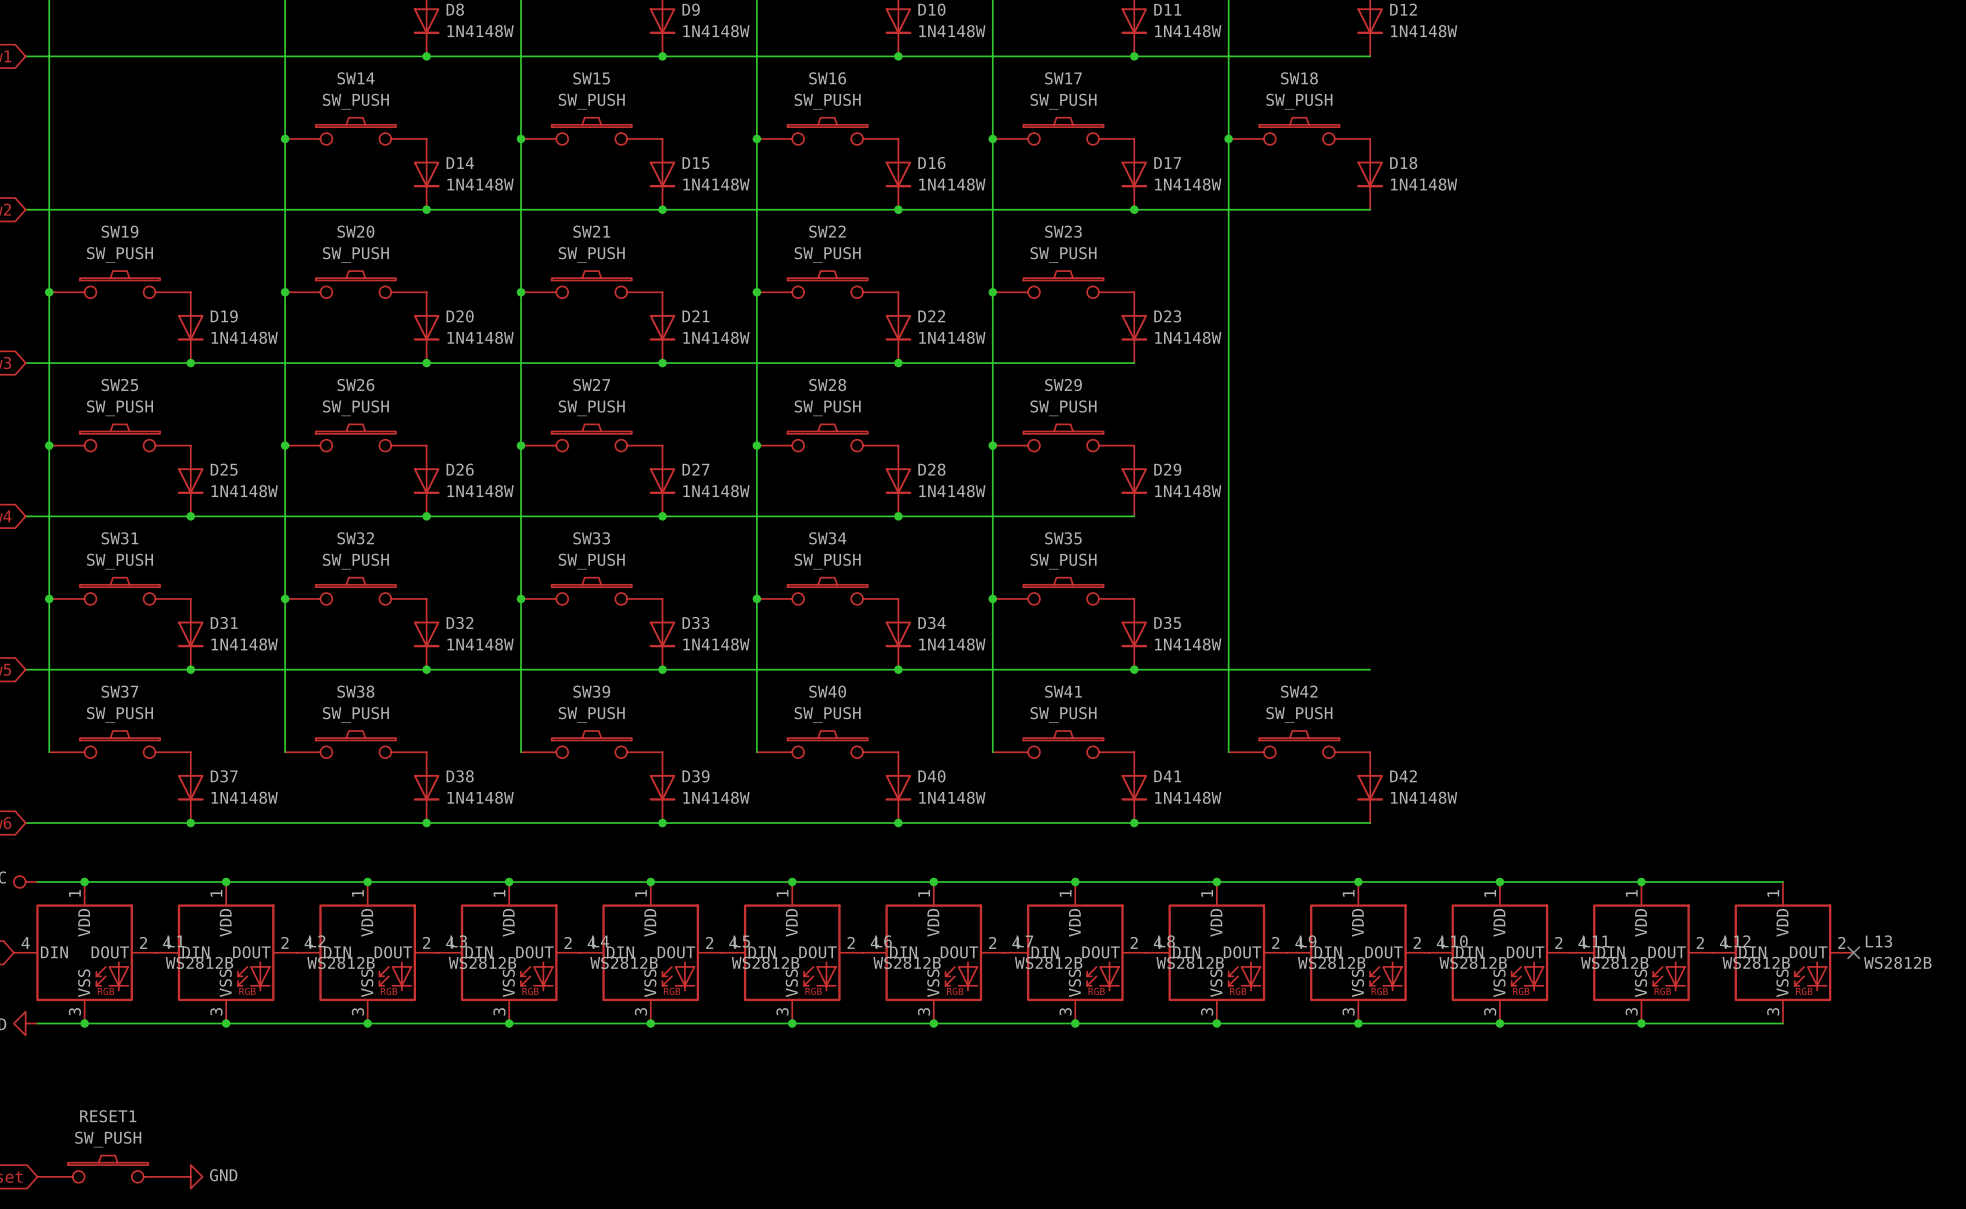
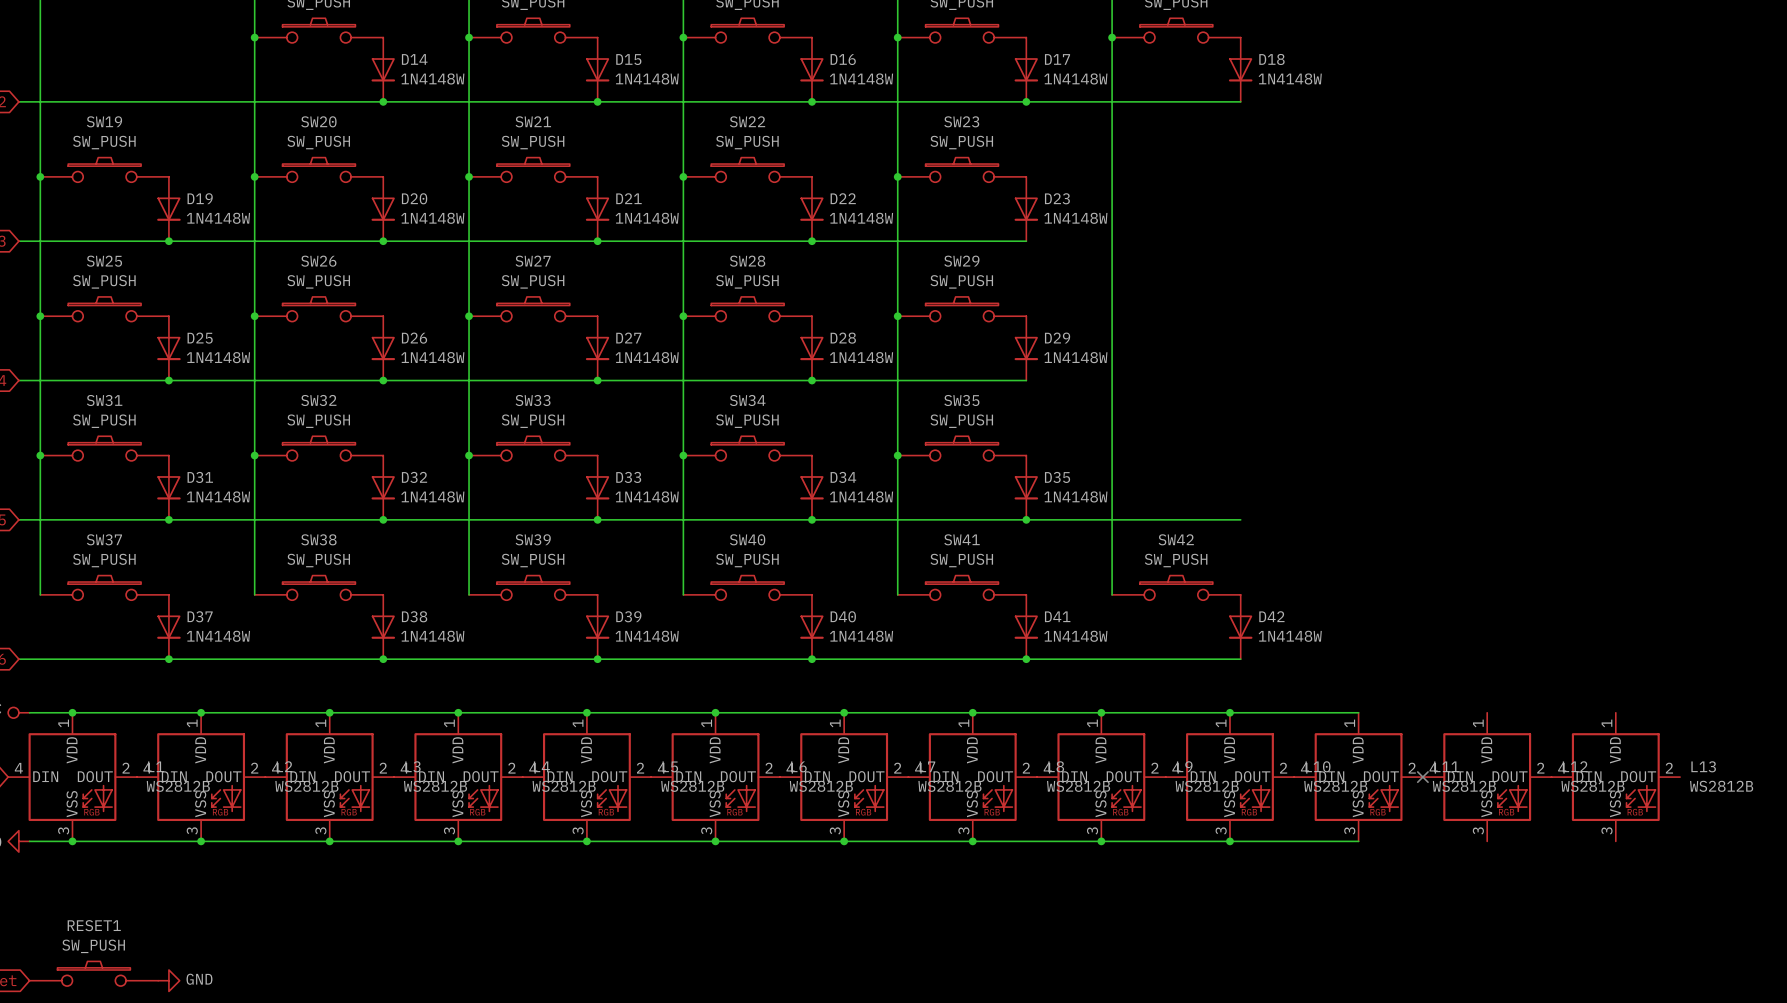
wire: (1499, 881) (1782, 881) -> none
junction: (1499, 881) -> none
junction: (1641, 881) -> none
no-connect mark: none -> (1422, 777)
no-connect mark: (1853, 952) -> none
wire: (1499, 1023) (1782, 1023) -> none
junction: (1499, 1023) -> none
junction: (1641, 1023) -> none

